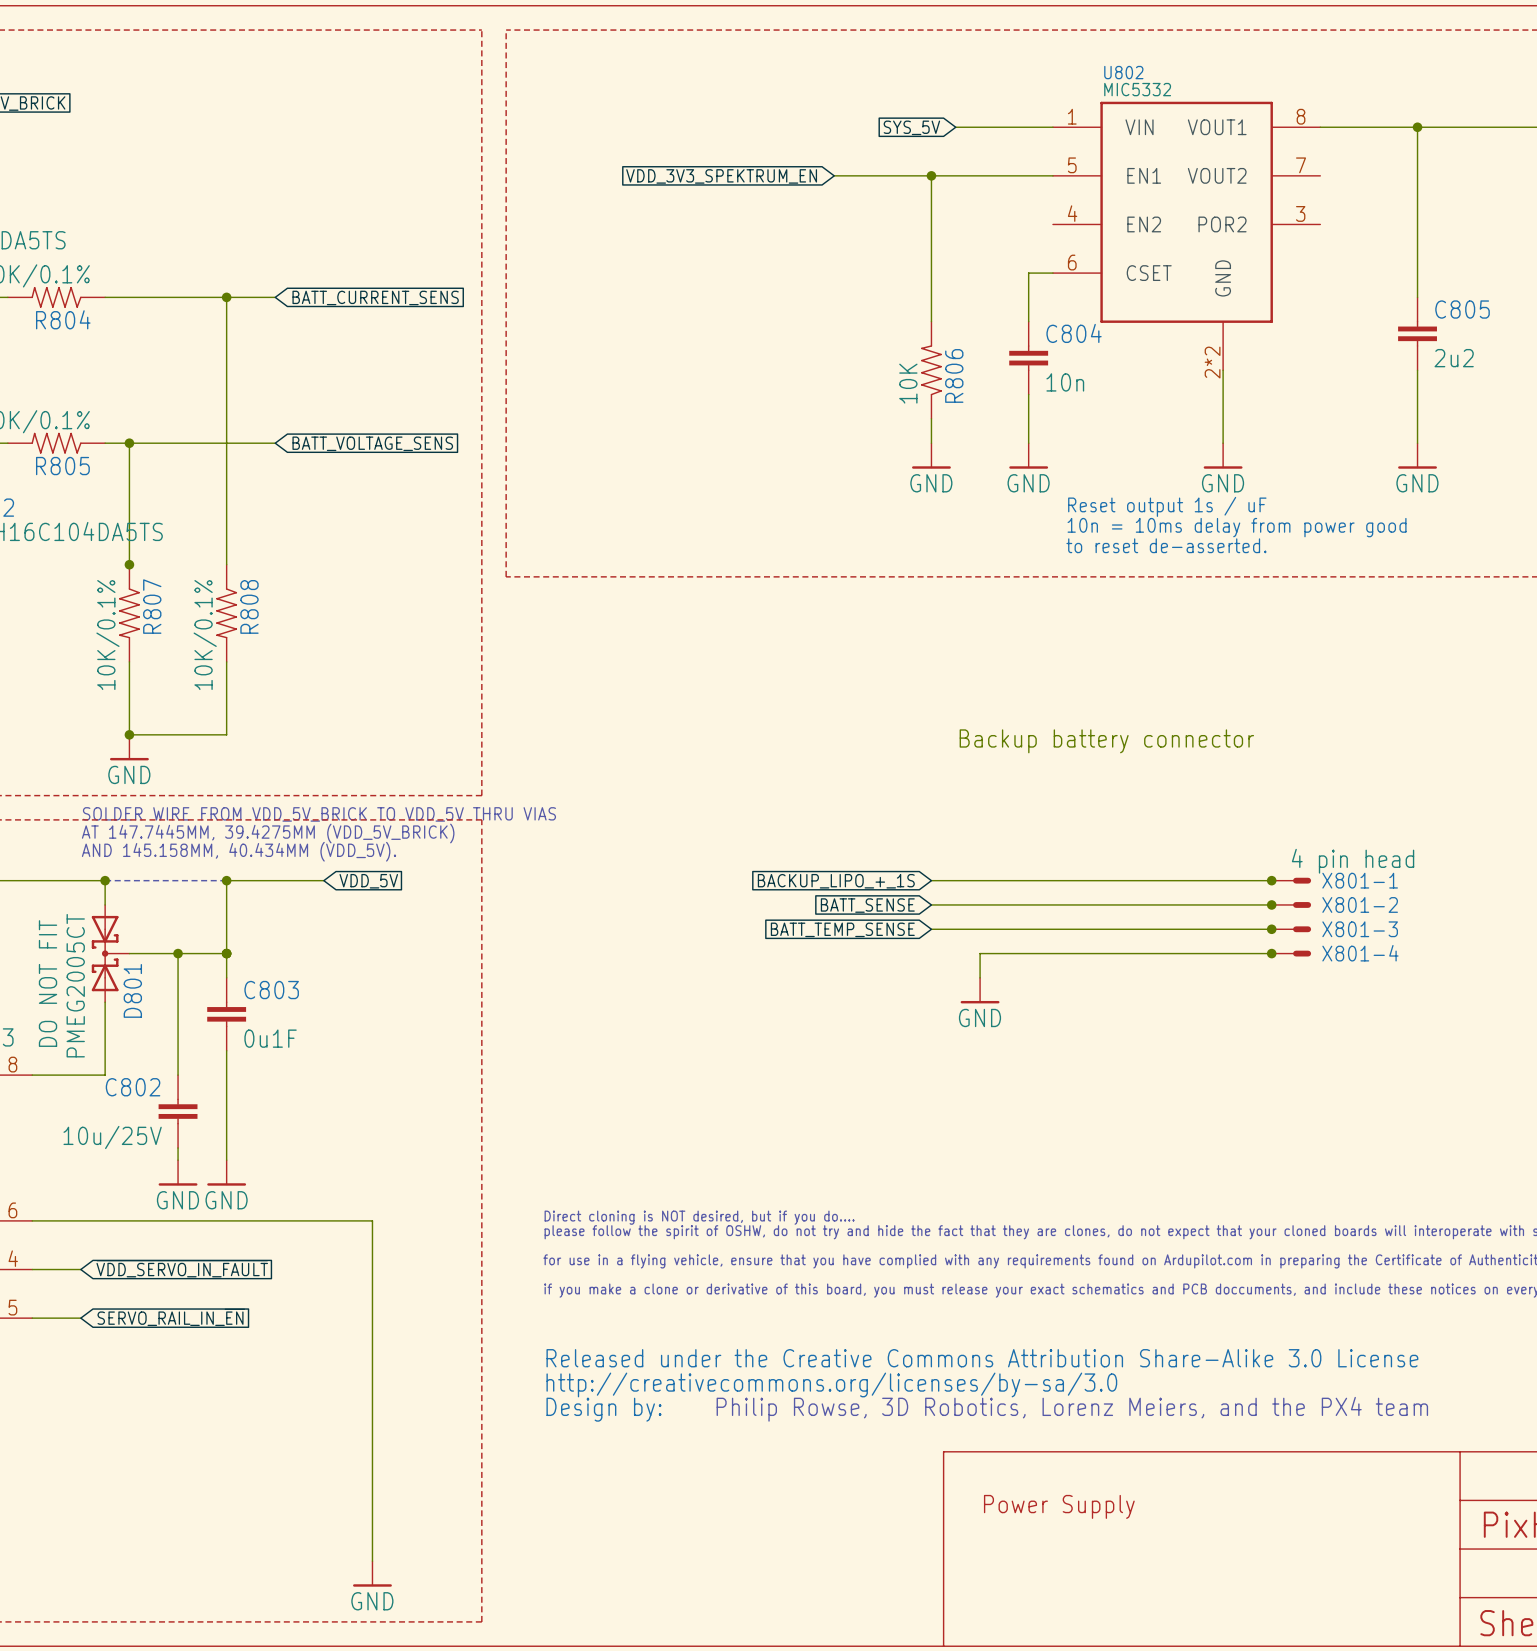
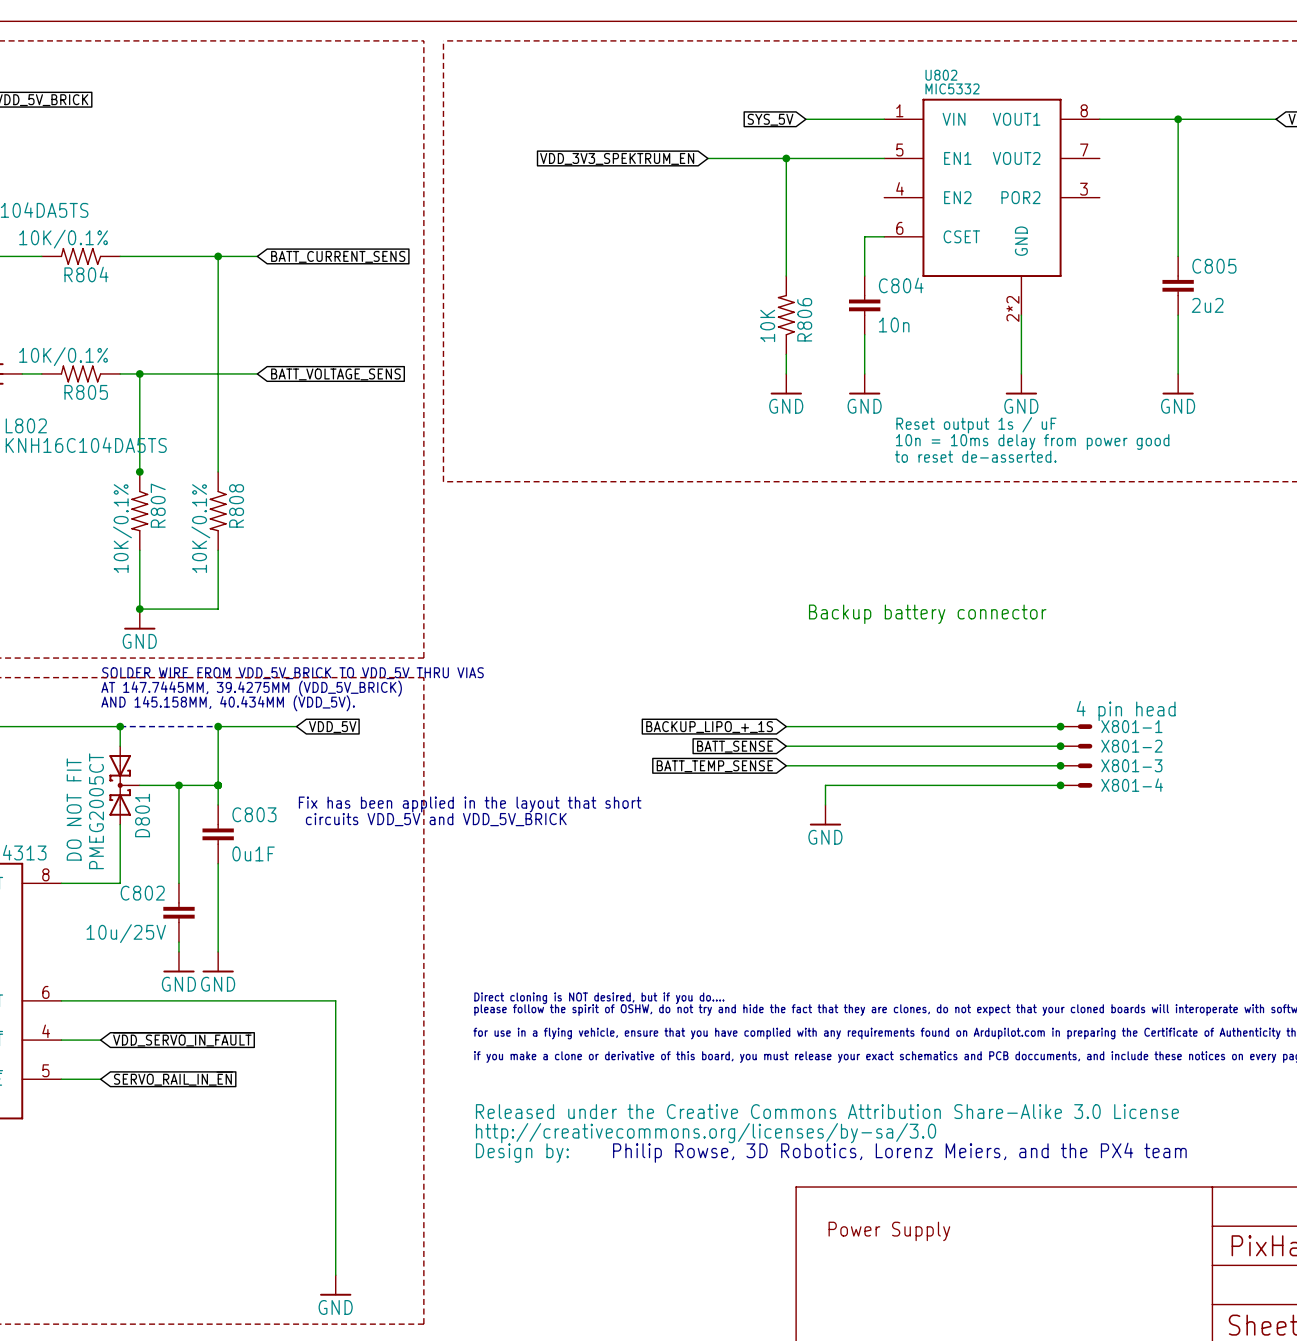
text: none -> Fix has been applied in the layout that short (470, 804)
text: none -> circuits VDD_5V and VDD_5V_BRICK (436, 819)

